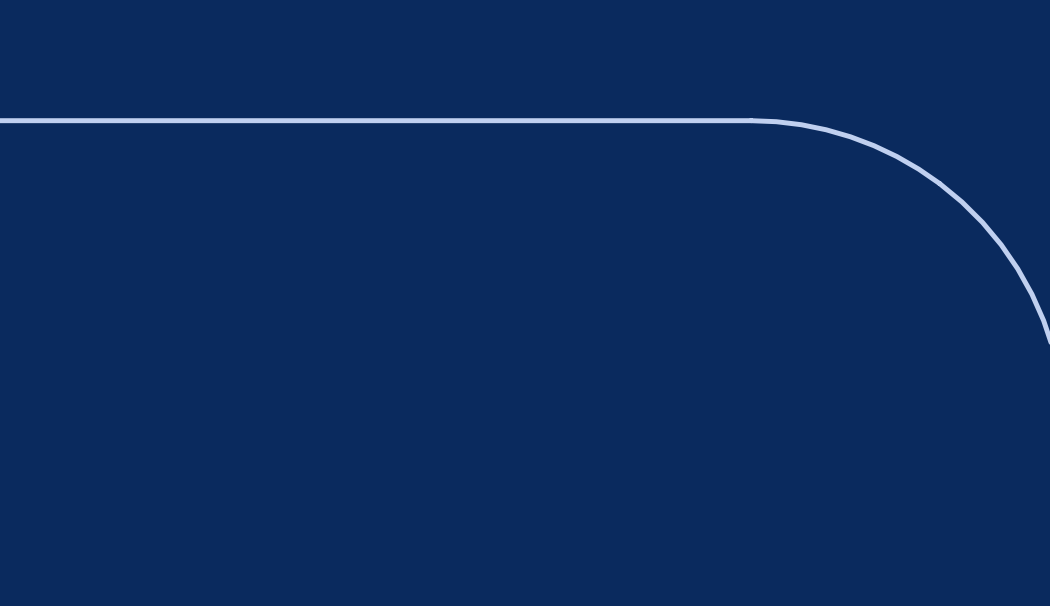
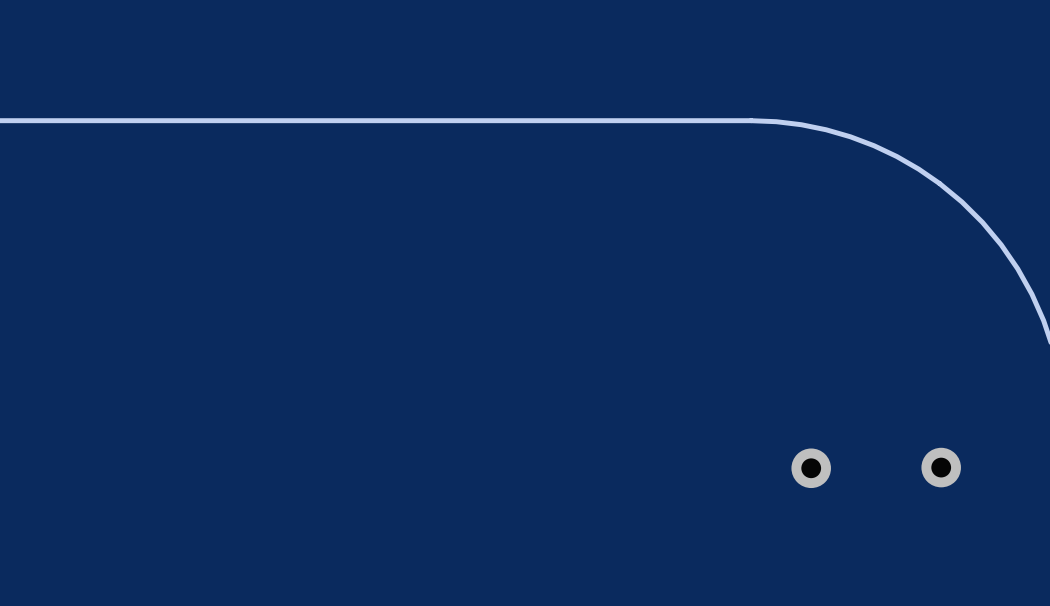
via: none -> (941, 467)
via: none -> (811, 468)

